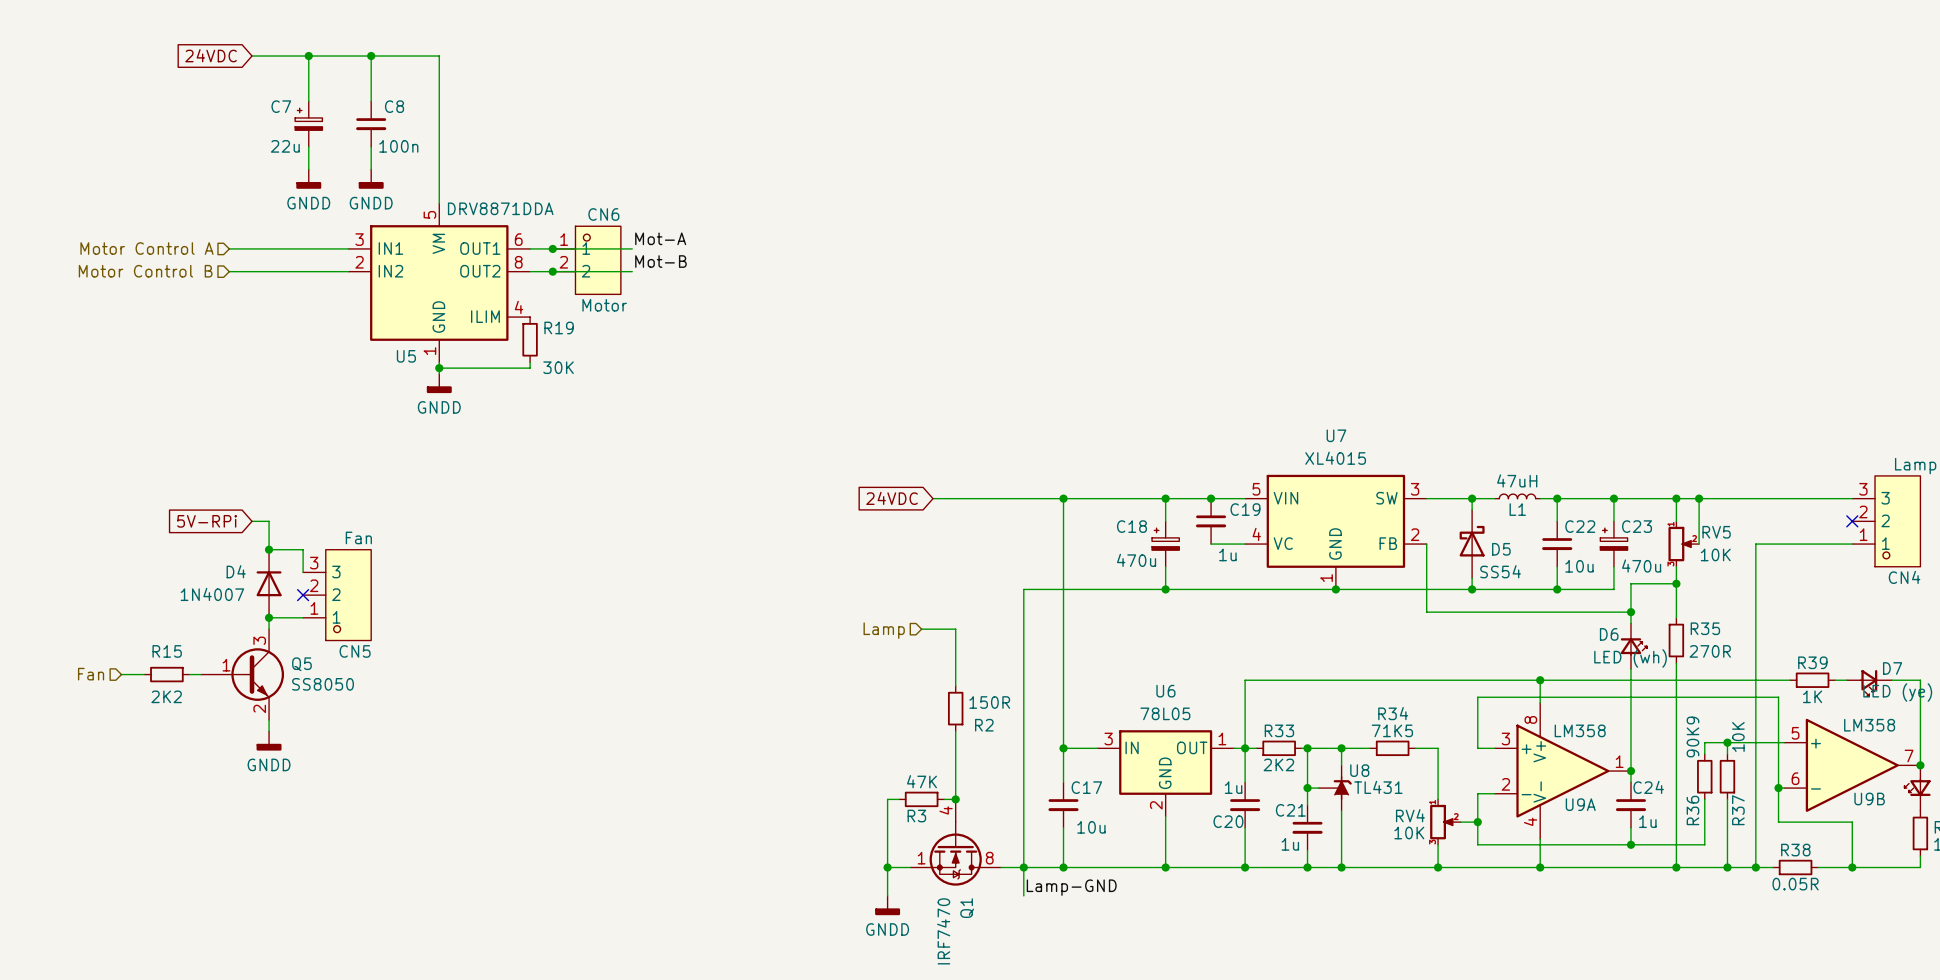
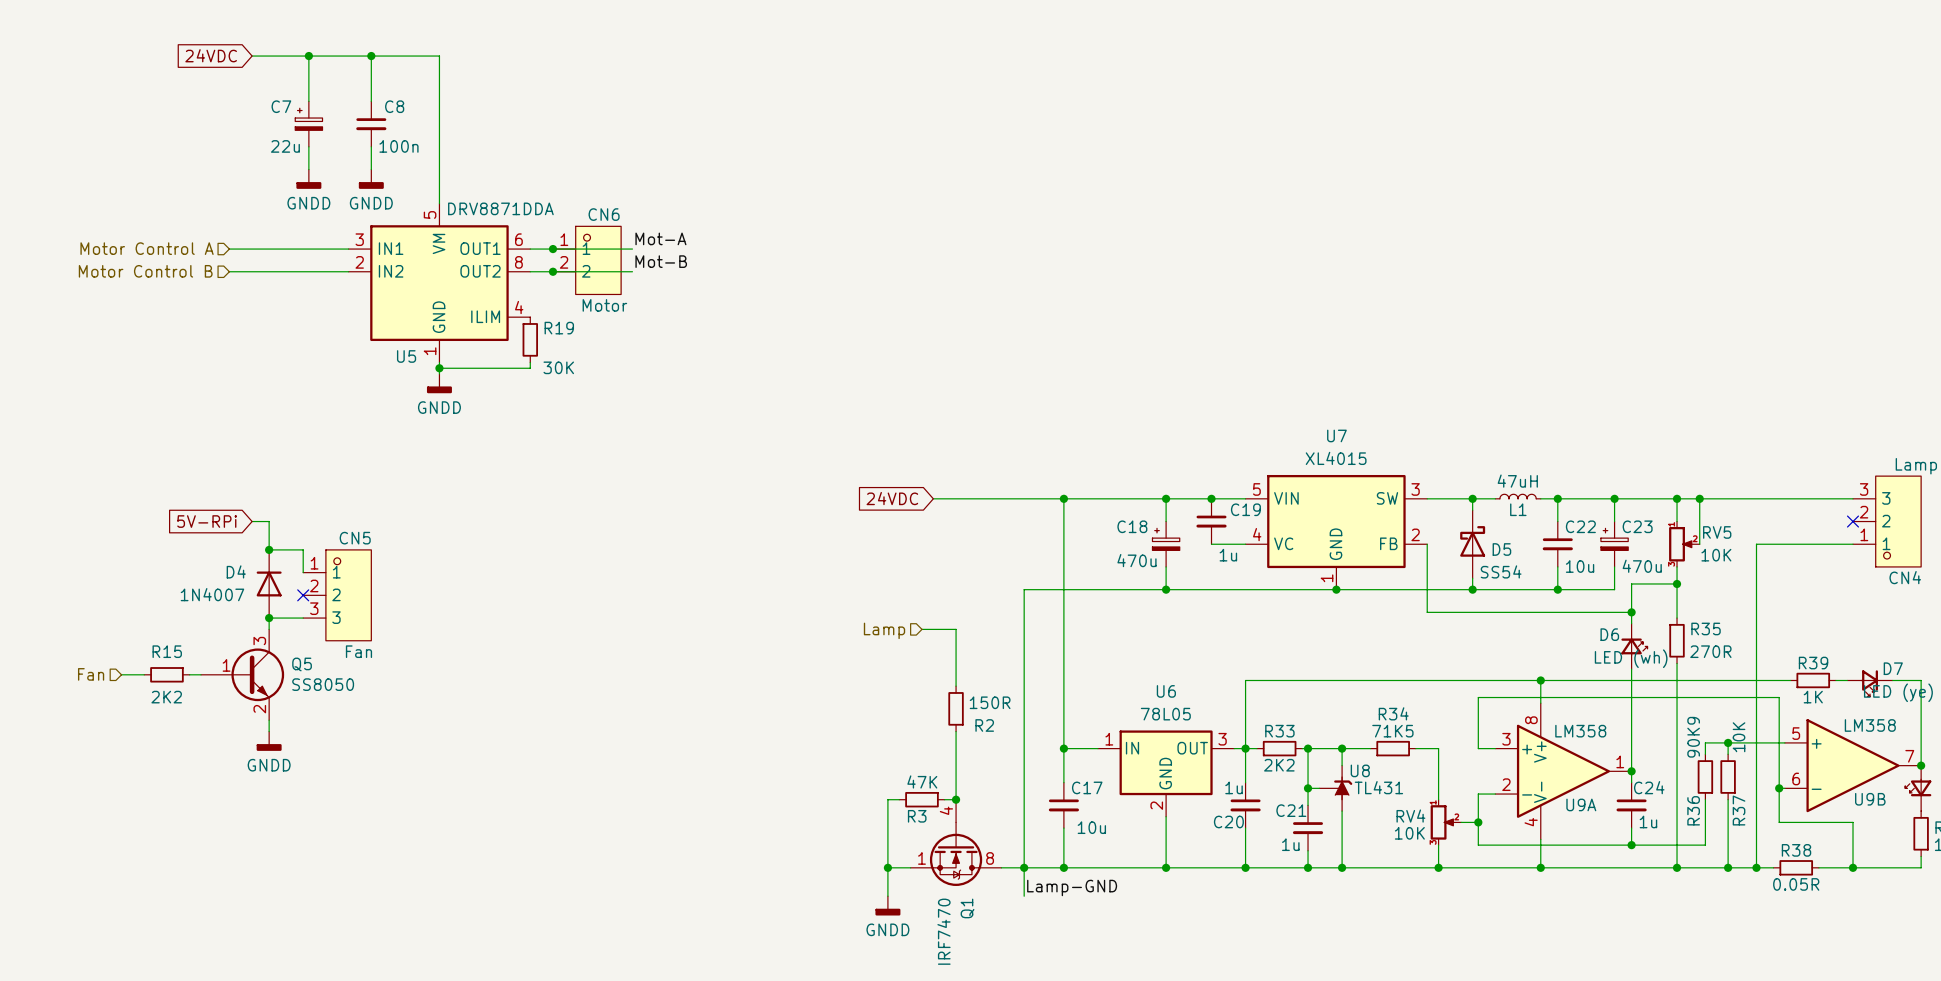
CN5 flip: as is (348, 595) -> up-down (348, 595)
U6 pin number: 3 (1108, 738) -> 1 (1109, 739)
U6 pin number: 1 (1222, 738) -> 3 (1222, 739)

